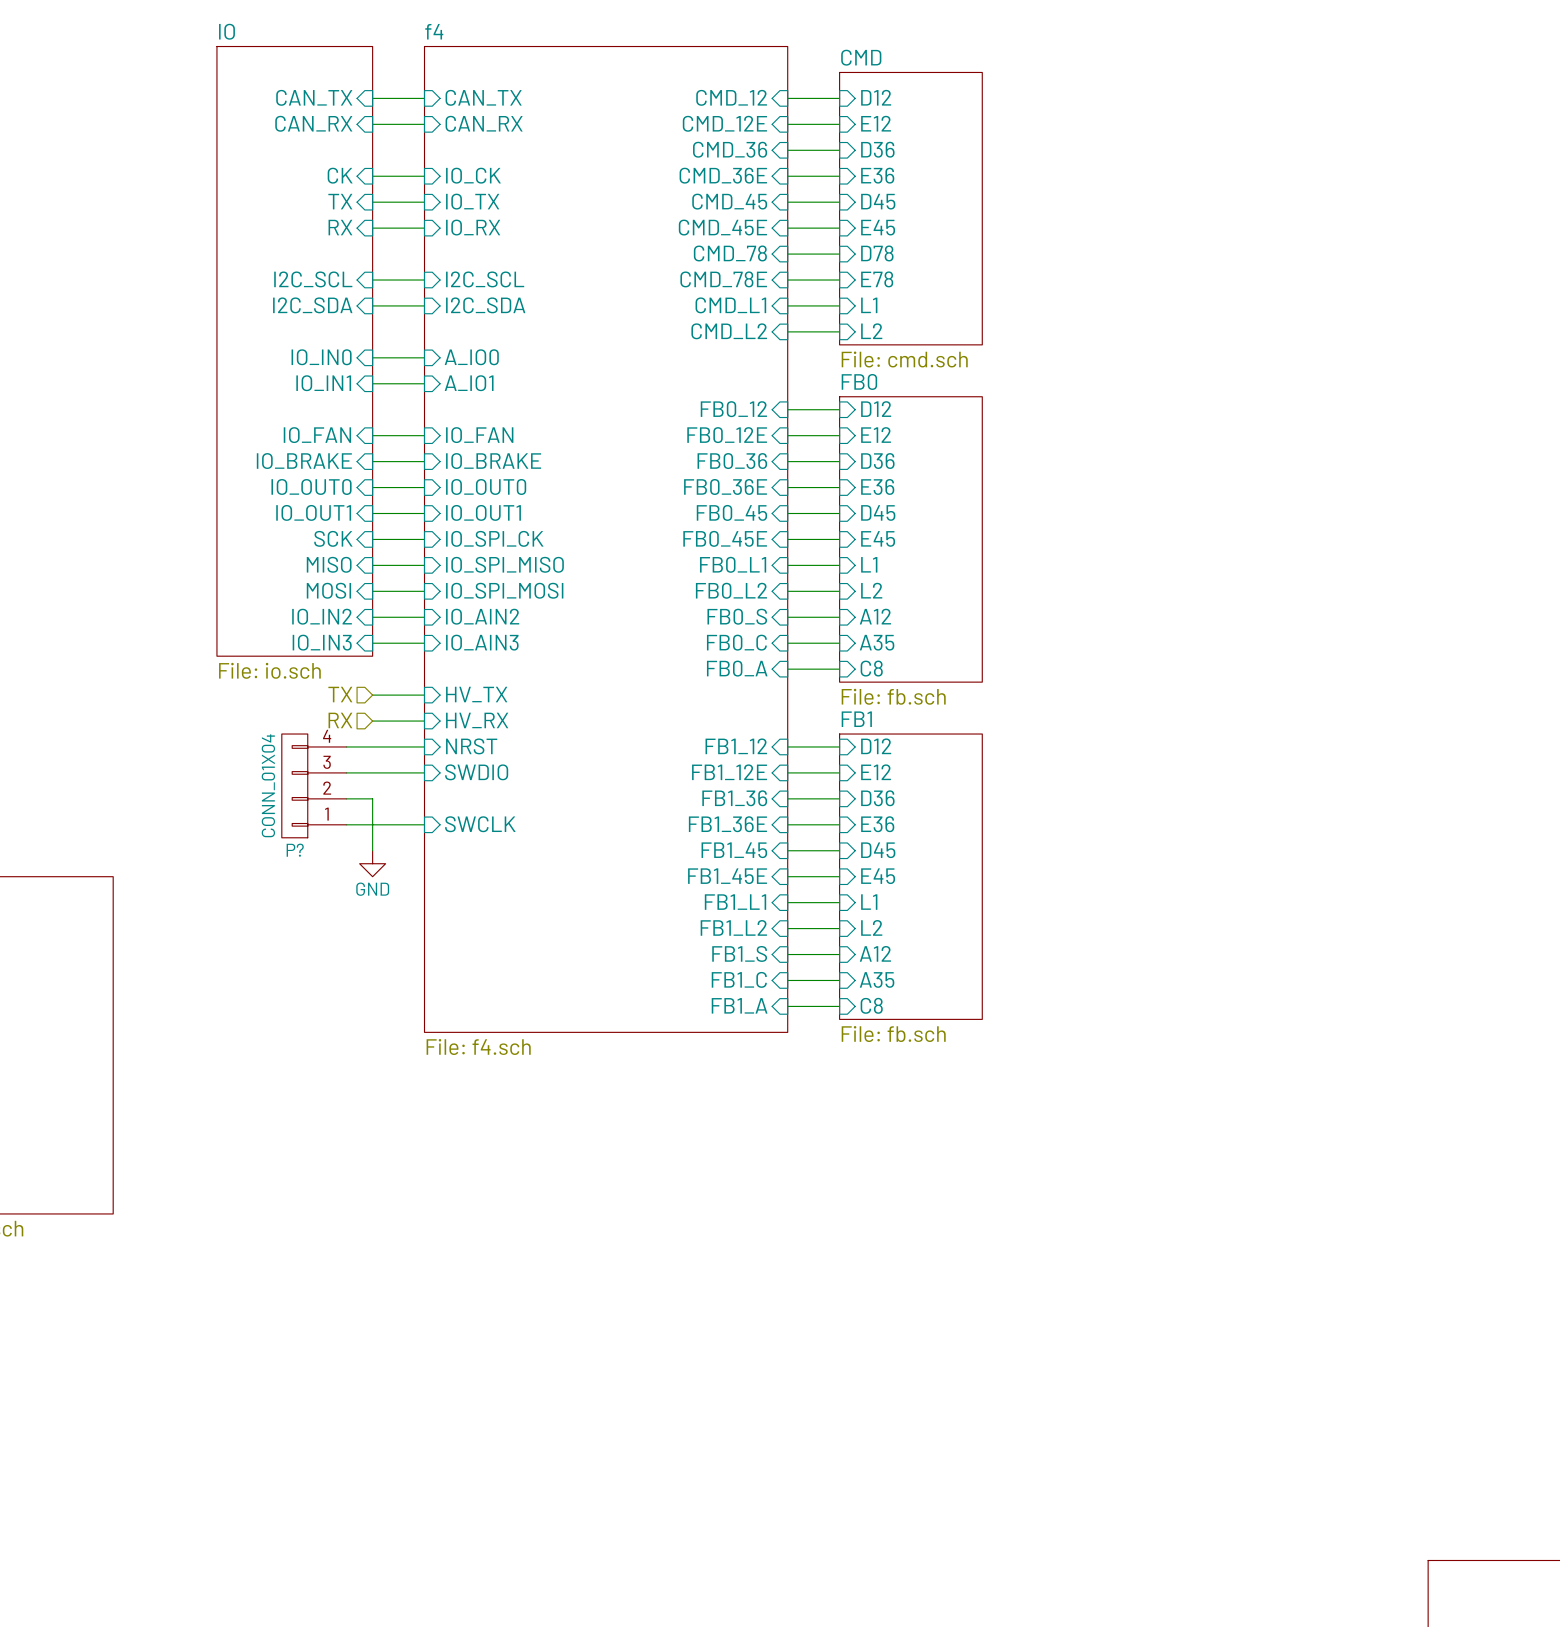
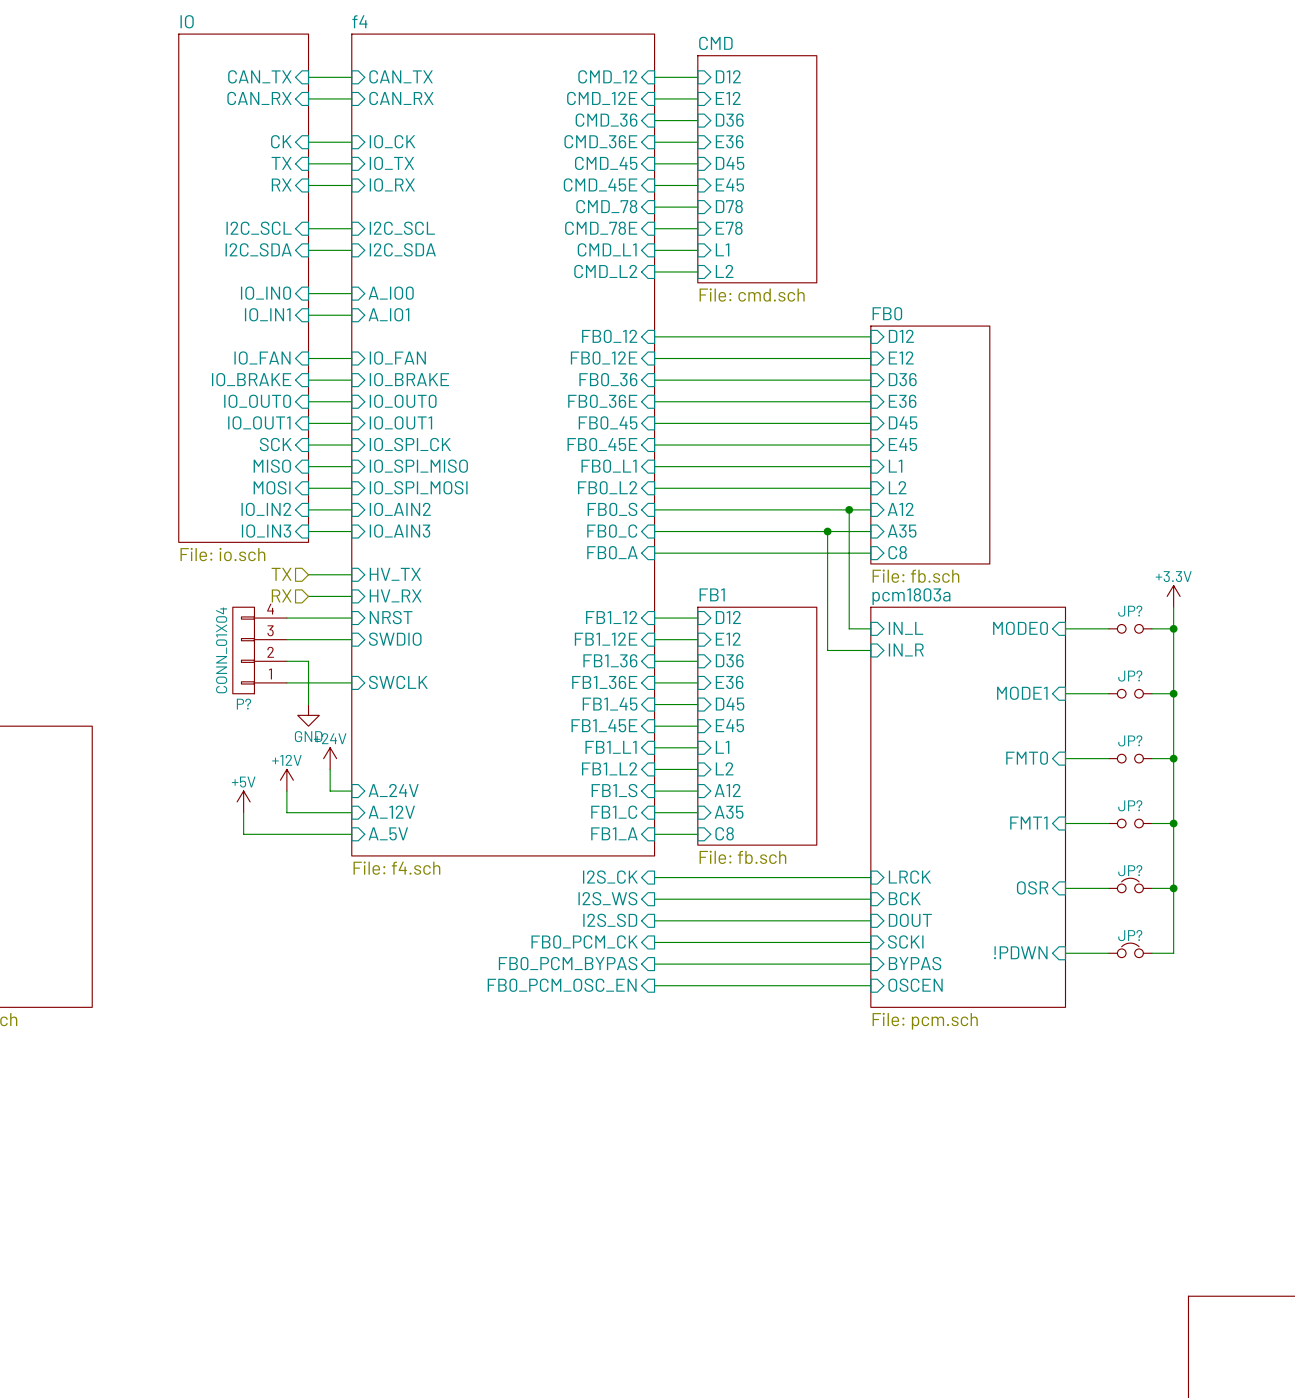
wire: none -> (697, 336) (870, 336)
sheet pin position: D12 (876, 409) -> D12 (901, 336)
wire: none -> (697, 358) (870, 358)
sheet pin position: E12 (876, 435) -> E12 (901, 357)
wire: none -> (697, 380) (870, 380)
sheet pin position: D36 (877, 461) -> D36 (902, 379)
sheet pin position: E36 (877, 486) -> E36 (902, 401)
wire: none -> (697, 401) (870, 401)
sheet pin position: D45 (878, 512) -> D45 (903, 422)
wire: none -> (697, 423) (870, 423)
sheet pin position: E45 (878, 538) -> E45 (902, 444)
wire: none -> (697, 445) (870, 445)
sheet FB0 position: (910, 539) -> (930, 445)
sheet pin position: L1 (869, 564) -> L1 (895, 466)
wire: none -> (697, 466) (870, 466)
sheet pin position: L2 (871, 590) -> L2 (897, 487)
wire: none -> (697, 488) (870, 488)
sheet pin position: A12 (875, 616) -> A12 (900, 509)
wire: none -> (697, 509) (870, 509)
wire: none -> (849, 509) (849, 628) (870, 628)
junction: none -> (849, 509)
sheet pin position: A35 (877, 642) -> A35 (902, 531)
wire: none -> (697, 531) (870, 531)
wire: none -> (827, 531) (827, 650) (870, 650)
junction: none -> (827, 531)
sheet pin position: C8 (871, 668) -> C8 (897, 552)
wire: none -> (697, 553) (870, 553)
power symbol: none -> +3.3V (1173, 596)
wire: none -> (1173, 607) (1173, 953) (1152, 953)
sheet pin: none -> IN_L (906, 628)
sheet pin: none -> MODE0 (1020, 628)
wire: none -> (1065, 628) (1108, 628)
JP?: none -> (1130, 628)
wire: none -> (1152, 628) (1173, 628)
junction: none -> (1173, 628)
sheet pin: none -> IN_R (906, 649)
sheet pin: none -> MODE1 (1022, 693)
wire: none -> (1065, 693) (1108, 693)
JP?: none -> (1130, 693)
wire: none -> (1152, 693) (1173, 693)
junction: none -> (1173, 693)
power symbol: none -> +24V (330, 758)
sheet pin: none -> FMT0 (1027, 758)
wire: none -> (1065, 758) (1108, 758)
JP?: none -> (1130, 758)
wire: none -> (1152, 758) (1173, 758)
junction: none -> (1173, 758)
wire: none -> (330, 769) (330, 791) (351, 791)
power symbol: none -> +12V (286, 780)
sheet pin: none -> A_24V (393, 790)
wire: none -> (286, 791) (286, 812) (351, 812)
power symbol: none -> +5V (243, 801)
sheet pcm1803a: none -> File: pcm.sch (968, 807)
sheet pin: none -> A_12V (391, 812)
wire: none -> (243, 812) (243, 834) (351, 834)
sheet pin: none -> FMT1 (1028, 823)
wire: none -> (1065, 823) (1108, 823)
JP?: none -> (1130, 823)
wire: none -> (1152, 823) (1173, 823)
junction: none -> (1173, 823)
sheet pin: none -> A_5V (388, 833)
sheet pin: none -> I2S_CK (610, 877)
sheet pin: none -> LRCK (909, 877)
wire: none -> (654, 877) (870, 877)
JP?: none -> (1130, 885)
sheet pin: none -> OSR (1032, 887)
wire: none -> (1065, 888) (1108, 888)
wire: none -> (1152, 888) (1173, 888)
junction: none -> (1173, 888)
sheet pin: none -> I2S_WS (607, 898)
sheet pin: none -> BCK (904, 898)
wire: none -> (654, 899) (870, 899)
sheet pin: none -> I2S_SD (610, 920)
sheet pin: none -> DOUT (910, 920)
wire: none -> (654, 920) (870, 920)
sheet pin: none -> FB0_PCM_CK (584, 941)
sheet pin: none -> SCKI (905, 941)
wire: none -> (654, 942) (870, 942)
JP?: none -> (1130, 950)
sheet pin: none -> !PDWN (1020, 952)
wire: none -> (1065, 953) (1108, 953)
sheet pin: none -> FB0_PCM_BYPAS (568, 963)
sheet pin: none -> BYPAS (915, 963)
wire: none -> (654, 964) (870, 964)
sheet pin: none -> FB0_PCM_OSC_EN (562, 985)
sheet pin: none -> OSCEN (915, 985)
wire: none -> (654, 985) (870, 985)

